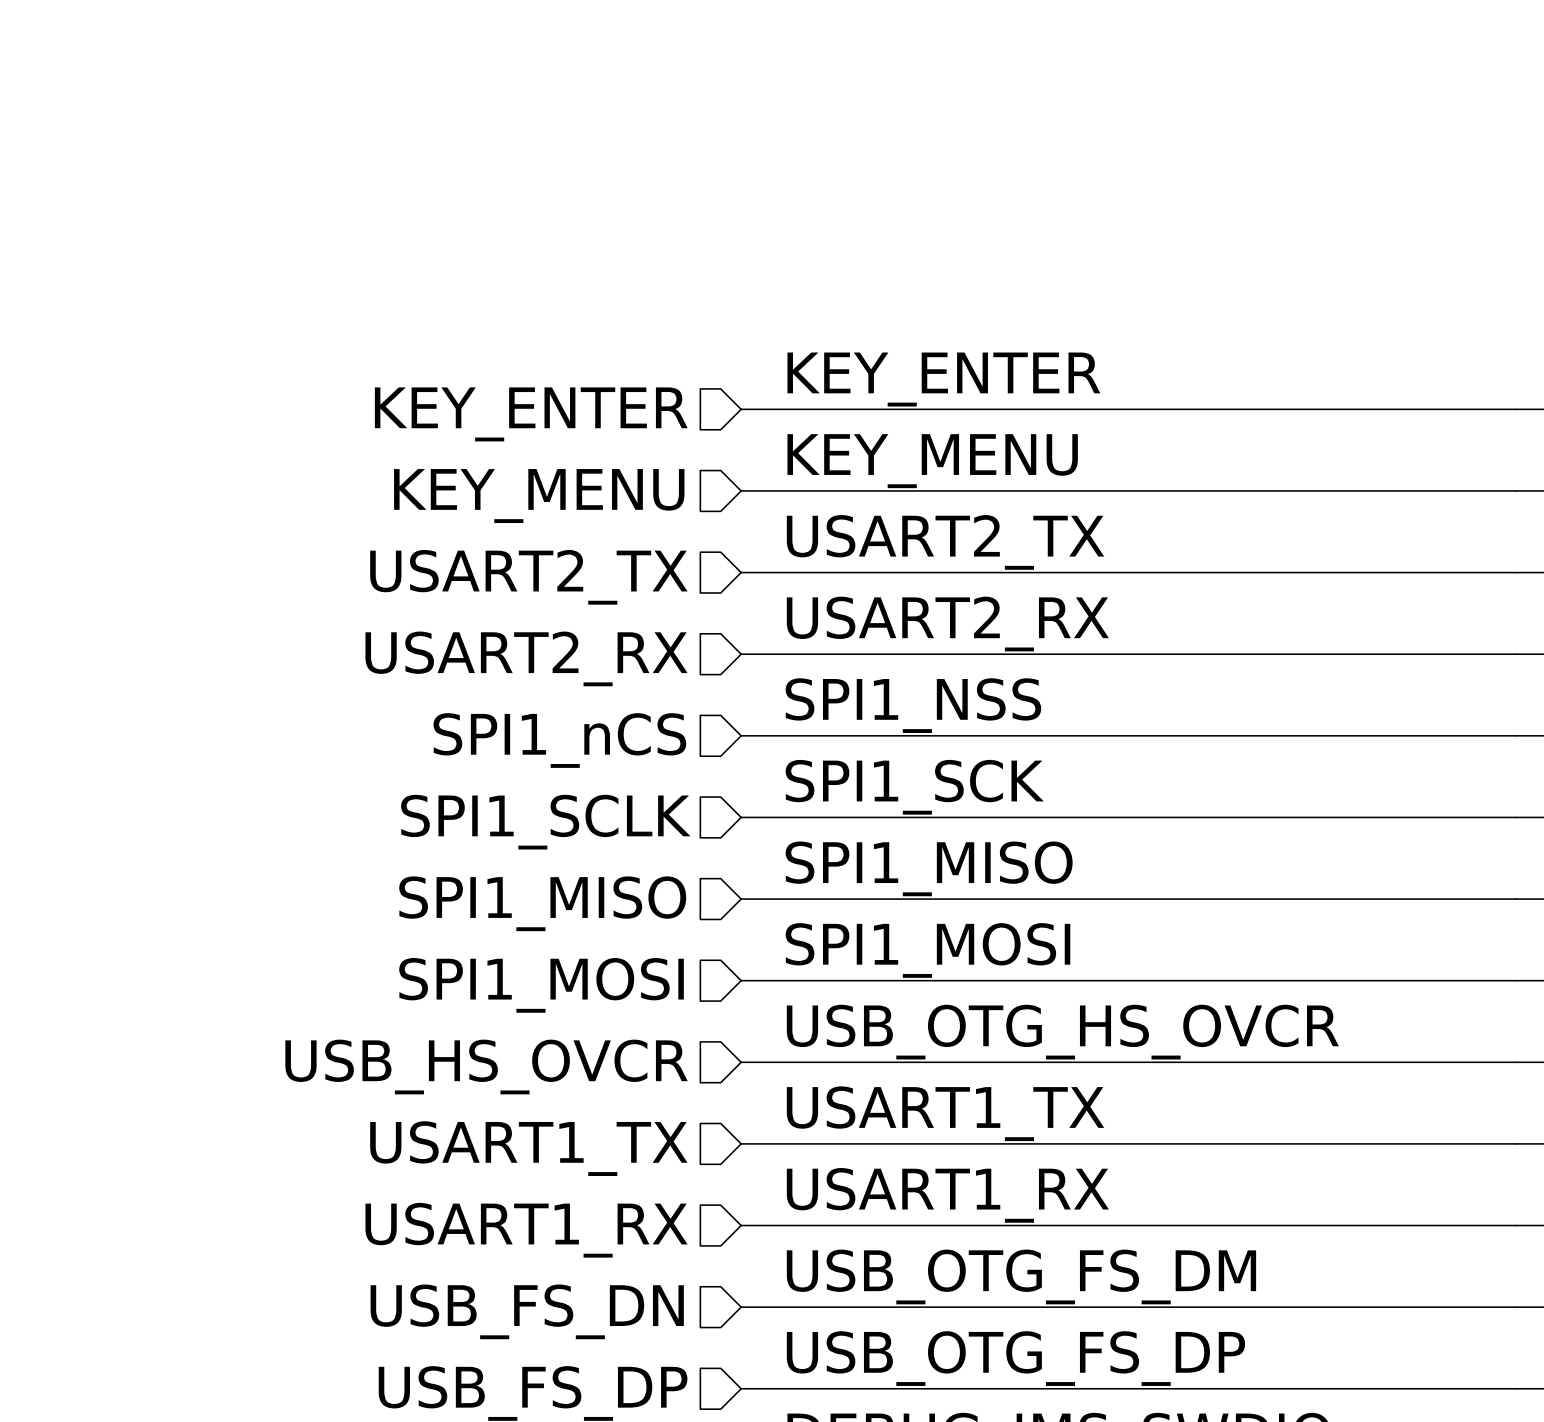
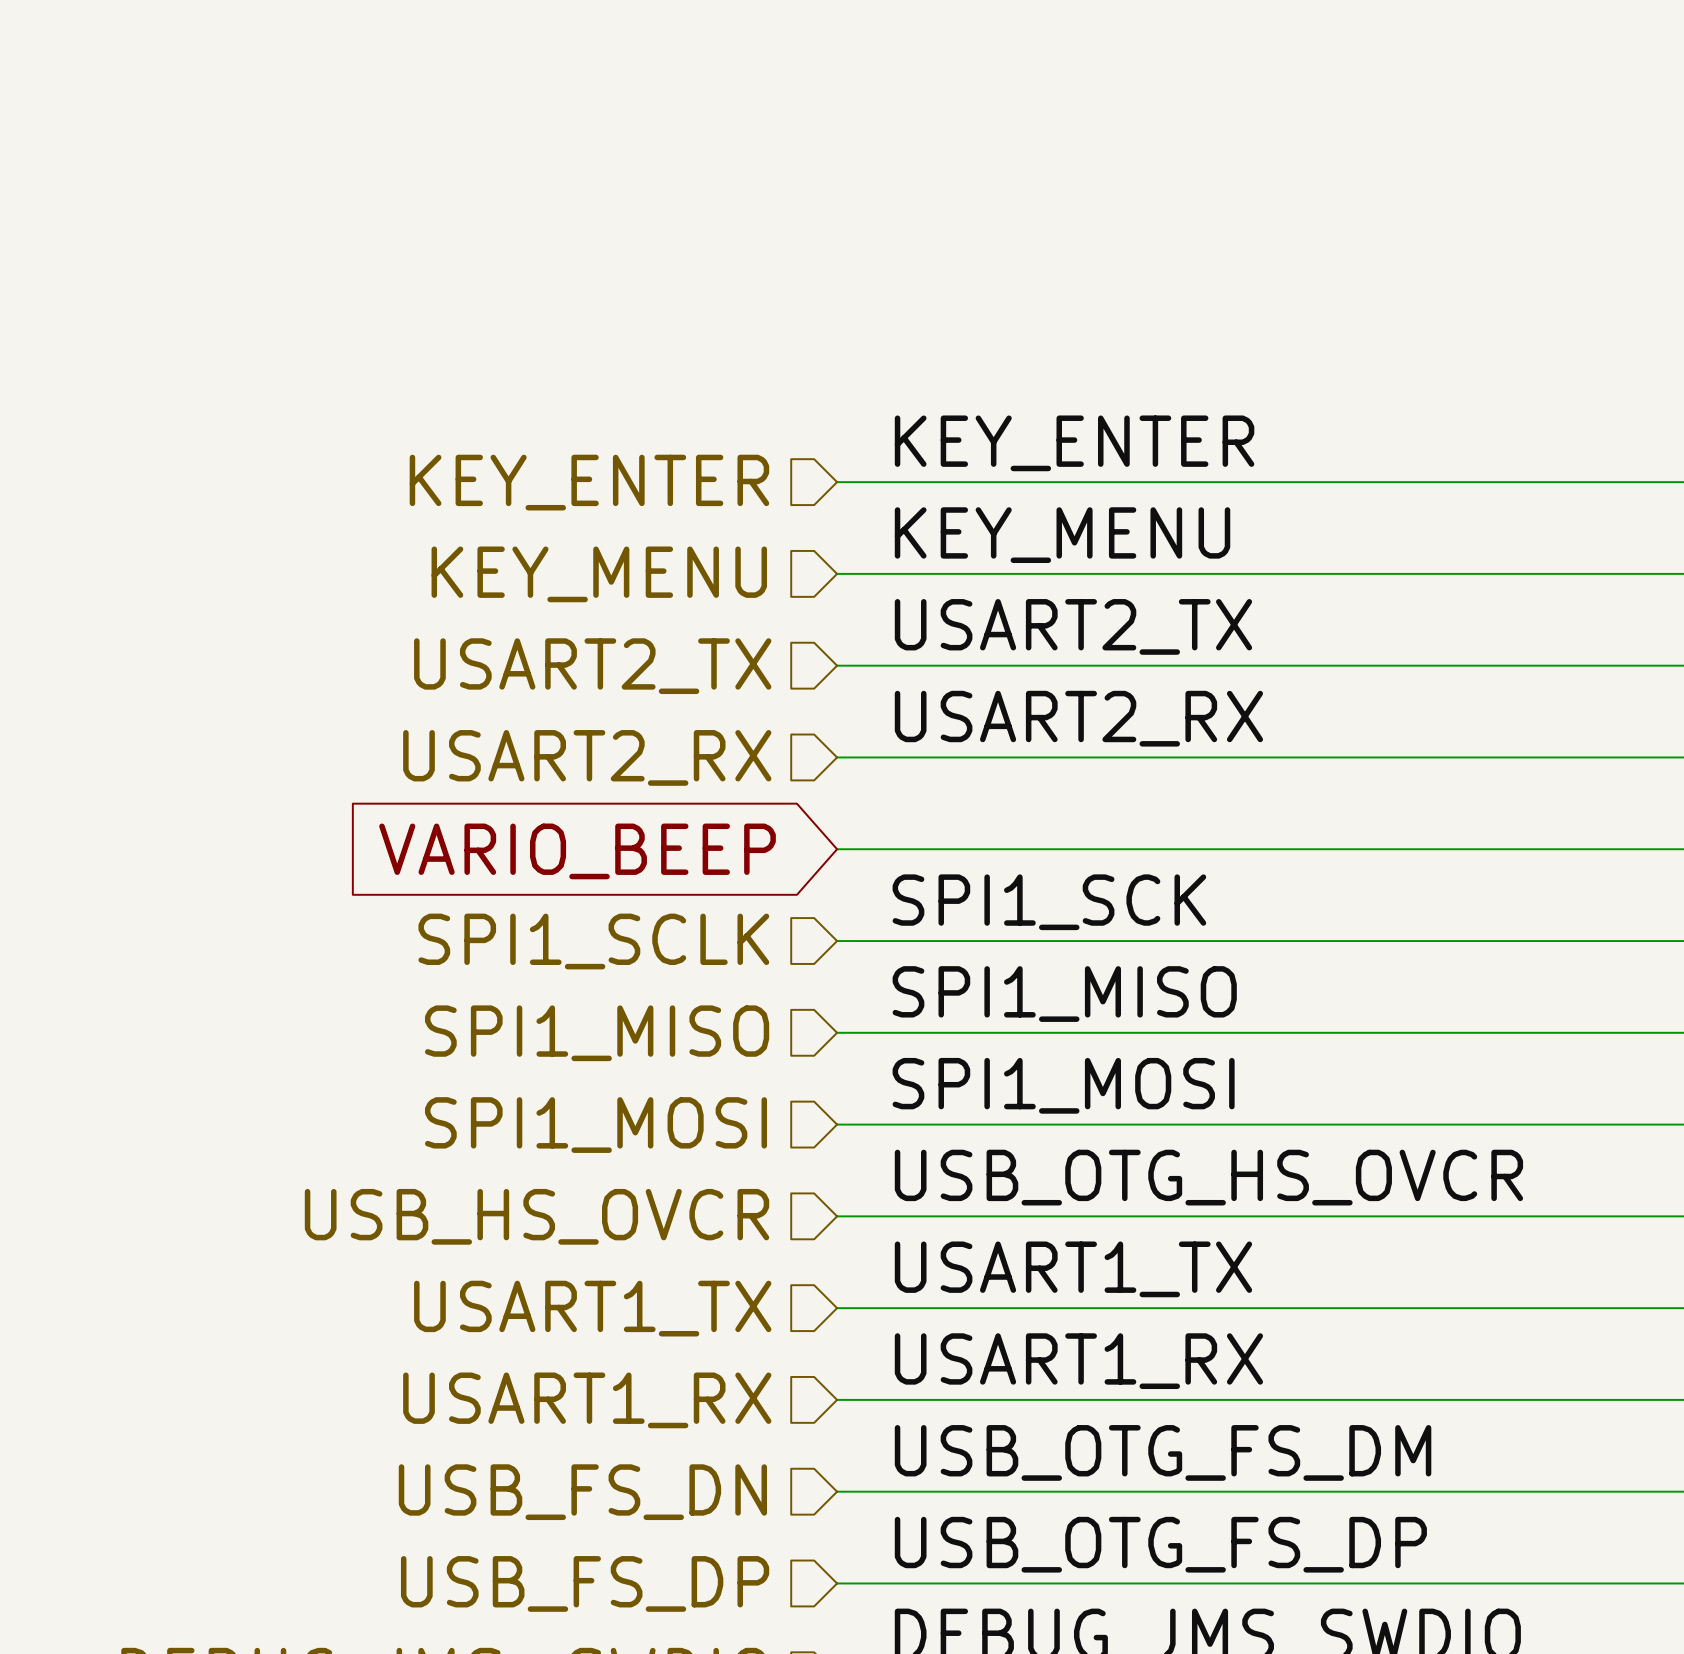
label: SPI1_NSS (913, 705) -> none
hierarchical label: SPI1_nCS (559, 740) -> none
global label: none -> VARIO_BEEP (577, 851)

